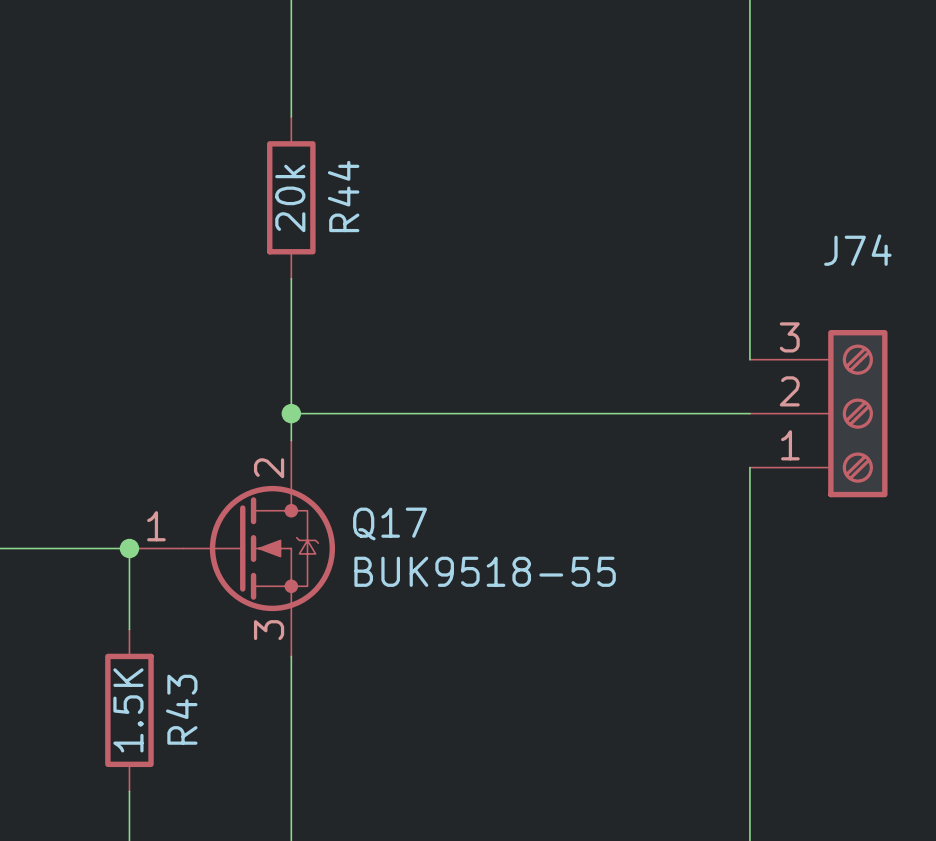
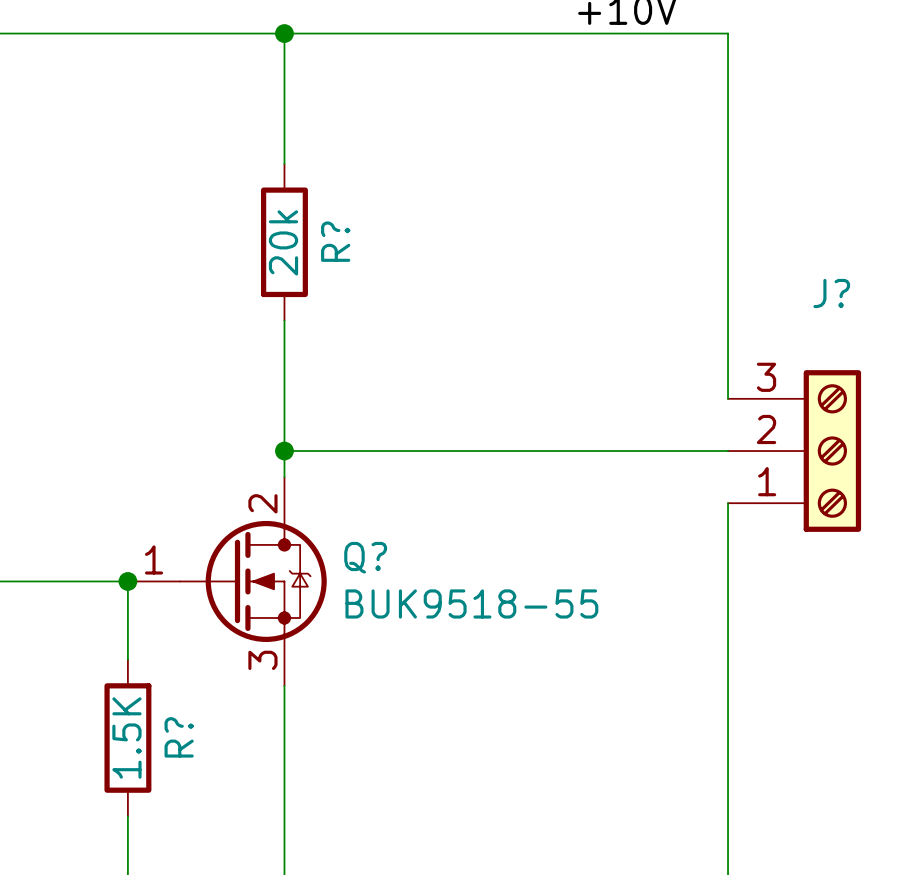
R44 name: R44 (343, 196) -> R? (335, 241)
J74 name: J74 (857, 250) -> J? (831, 293)
Q17 name: Q17 (390, 523) -> Q? (365, 557)
R43 name: R43 (181, 709) -> R? (179, 737)

